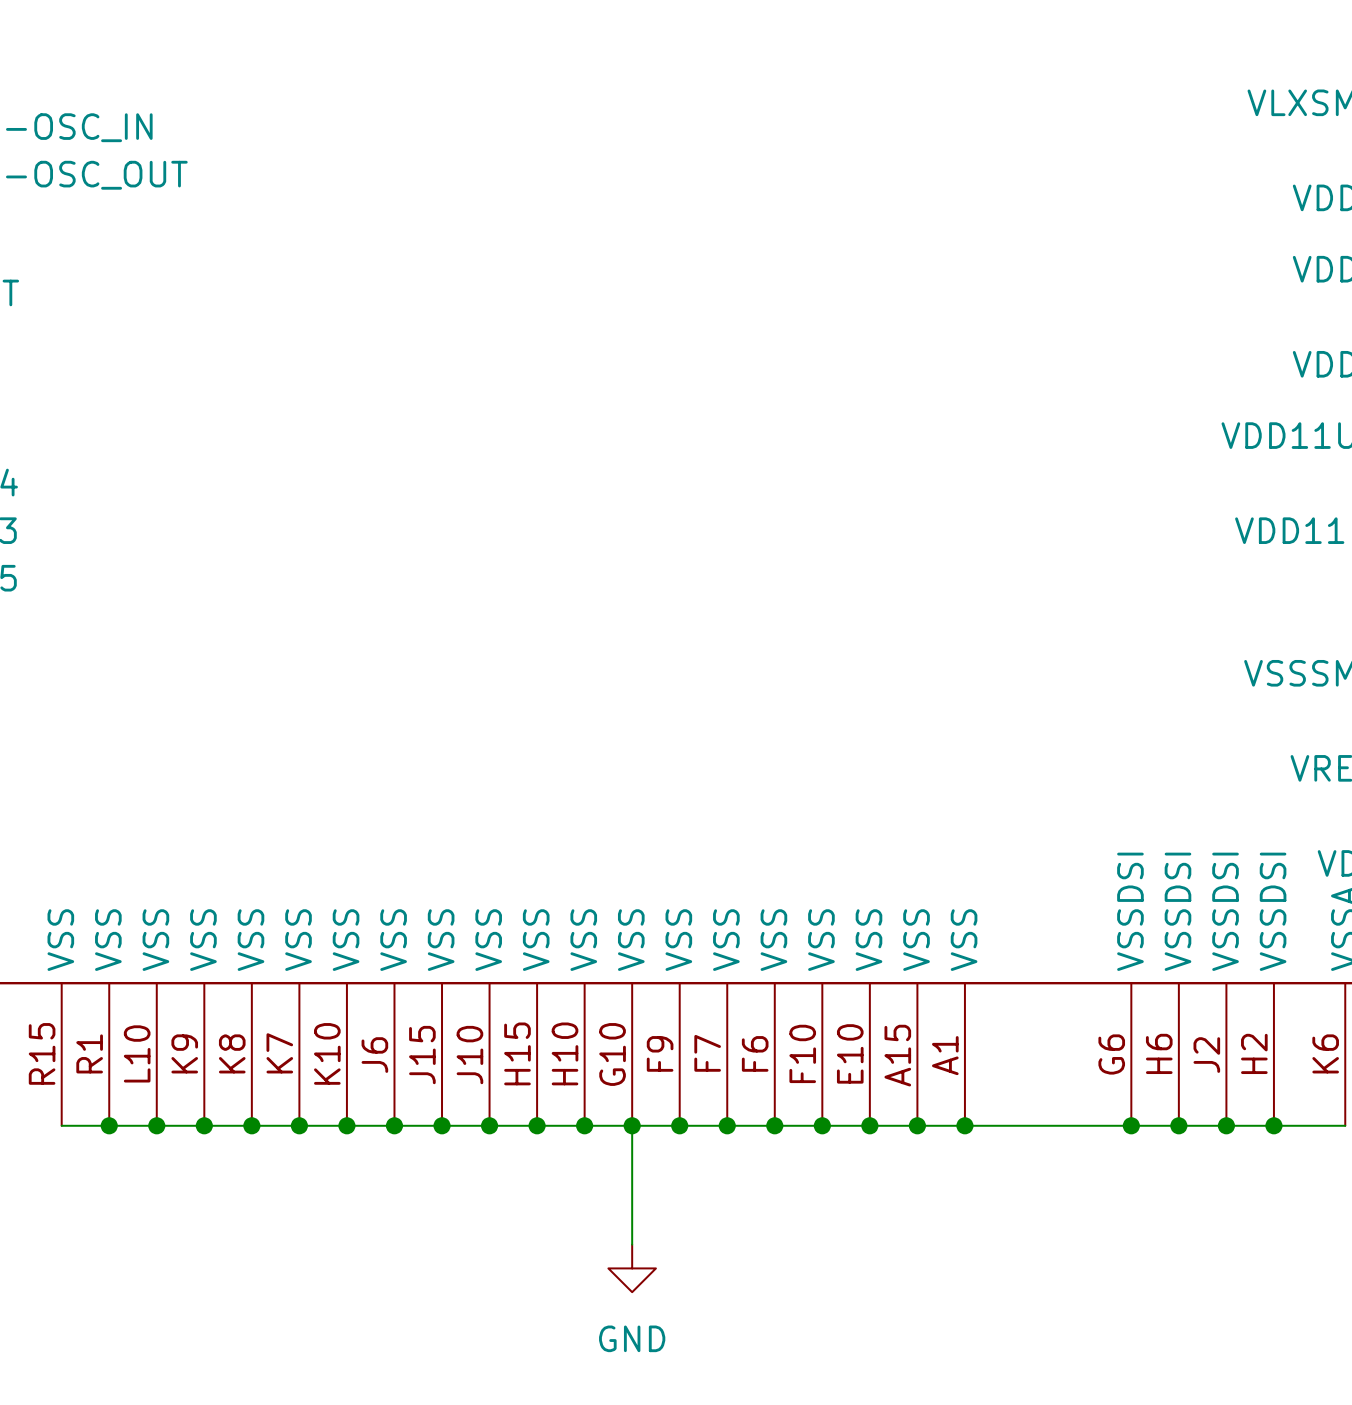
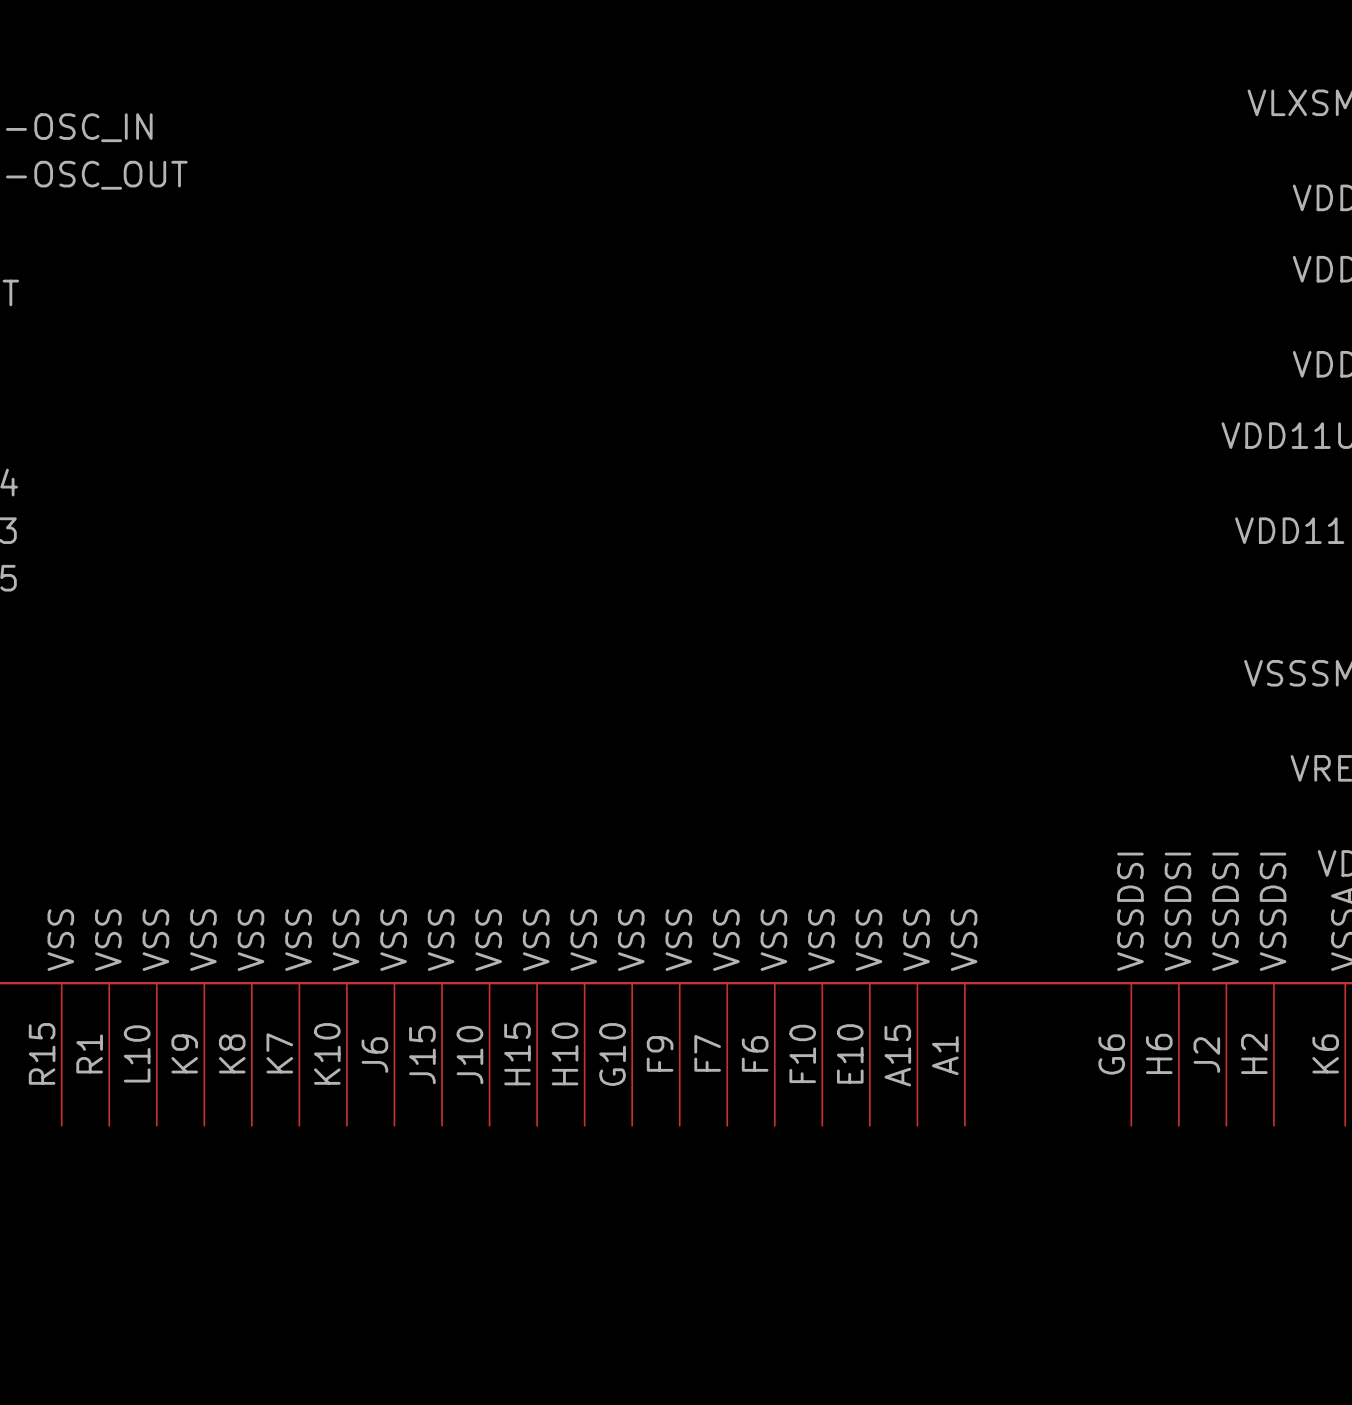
wire: (61, 1125) (1345, 1125) -> none
junction: (109, 1125) -> none
junction: (156, 1125) -> none
junction: (204, 1125) -> none
junction: (251, 1125) -> none
junction: (299, 1125) -> none
junction: (346, 1125) -> none
junction: (394, 1125) -> none
junction: (442, 1125) -> none
junction: (489, 1125) -> none
junction: (537, 1125) -> none
junction: (584, 1125) -> none
wire: (632, 1125) (632, 1244) -> none
junction: (632, 1125) -> none
junction: (679, 1125) -> none
junction: (727, 1125) -> none
junction: (774, 1125) -> none
junction: (822, 1125) -> none
junction: (869, 1125) -> none
junction: (917, 1125) -> none
junction: (964, 1125) -> none
junction: (1131, 1125) -> none
junction: (1178, 1125) -> none
junction: (1226, 1125) -> none
junction: (1273, 1125) -> none
power symbol: GND (632, 1268) -> none

